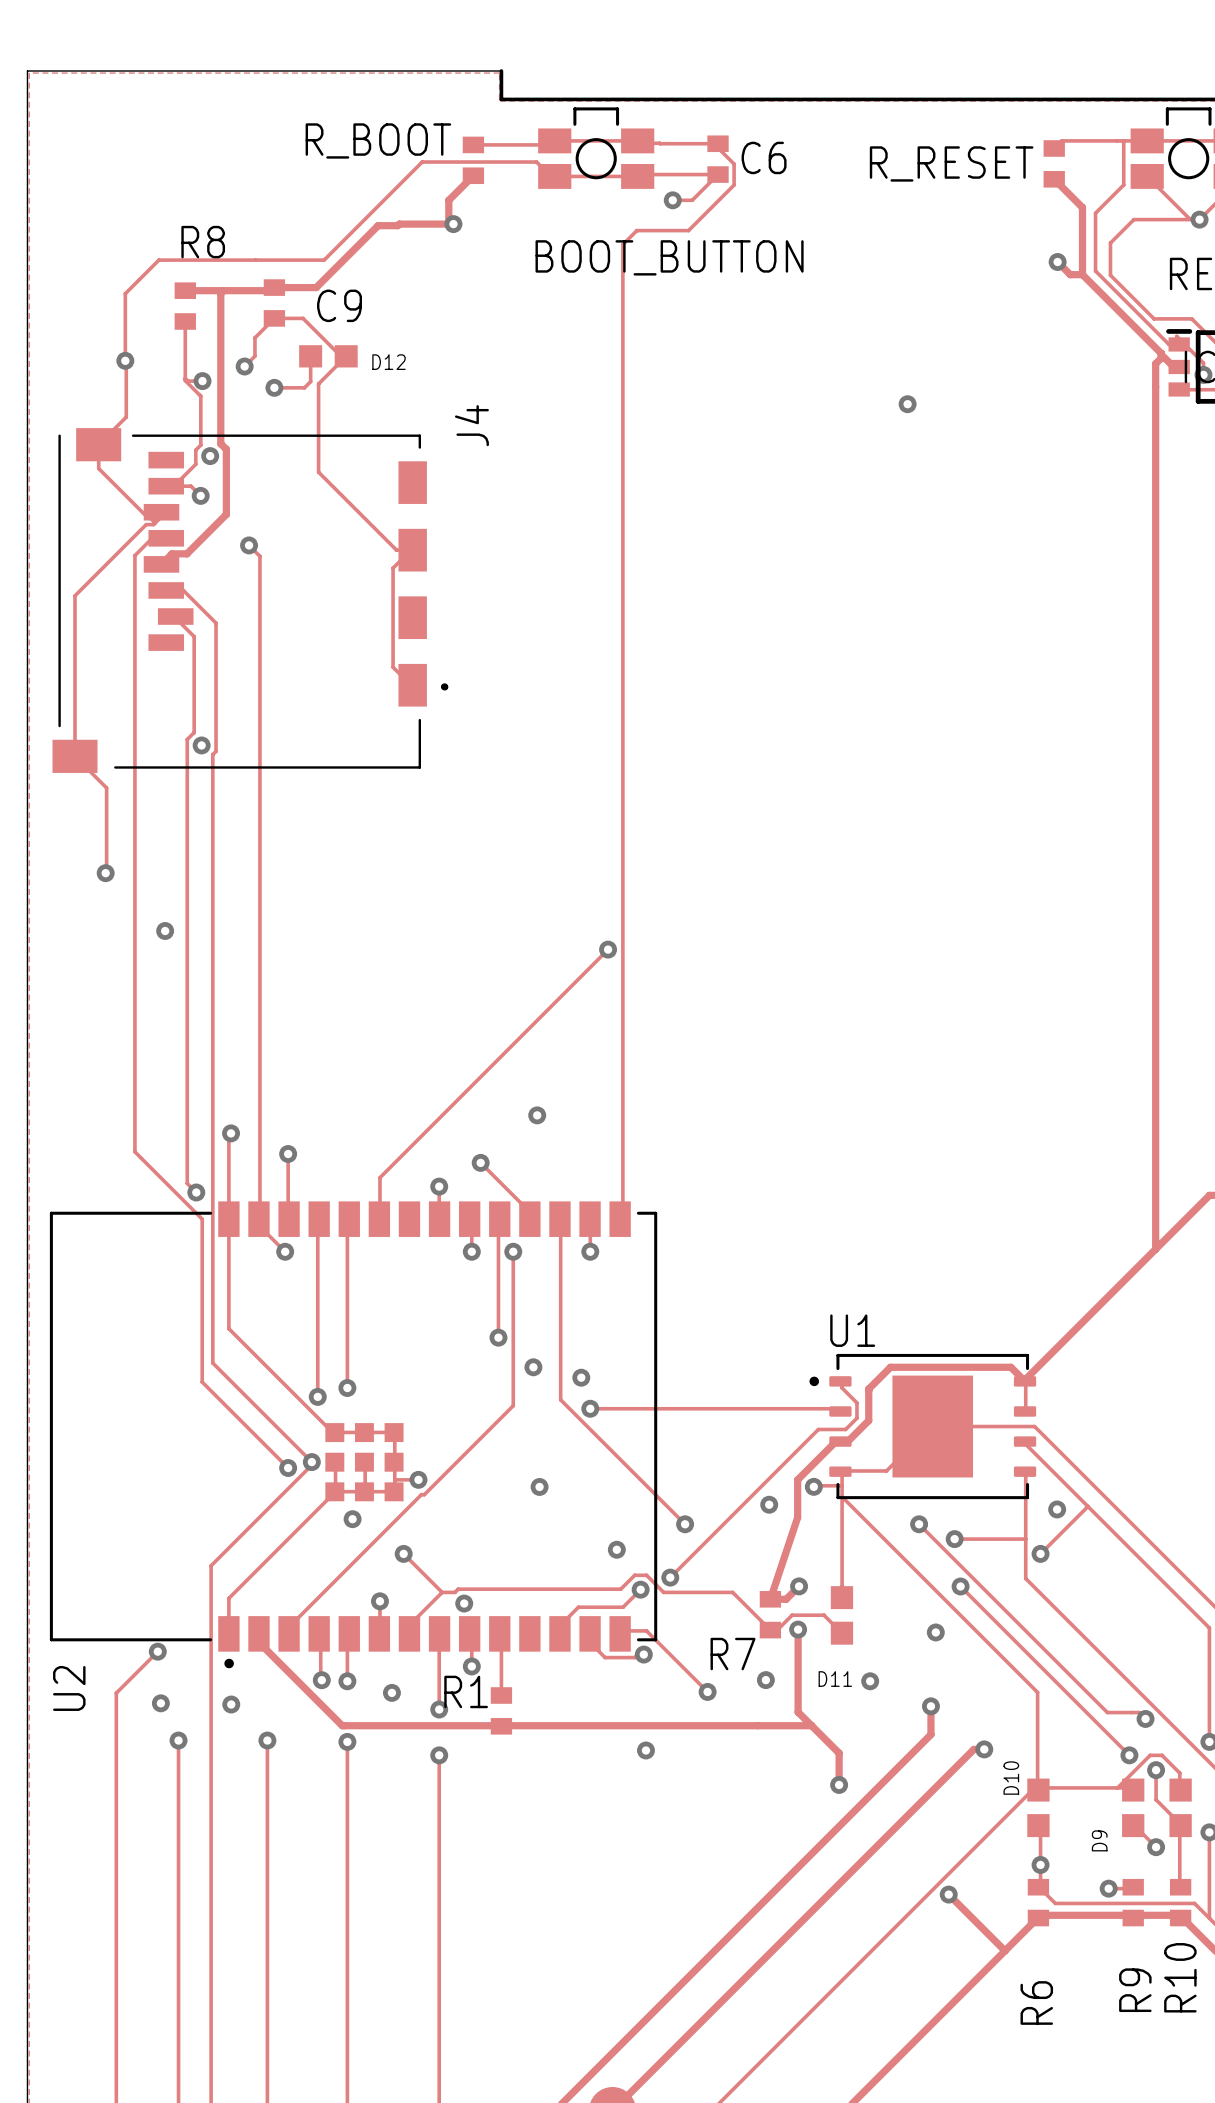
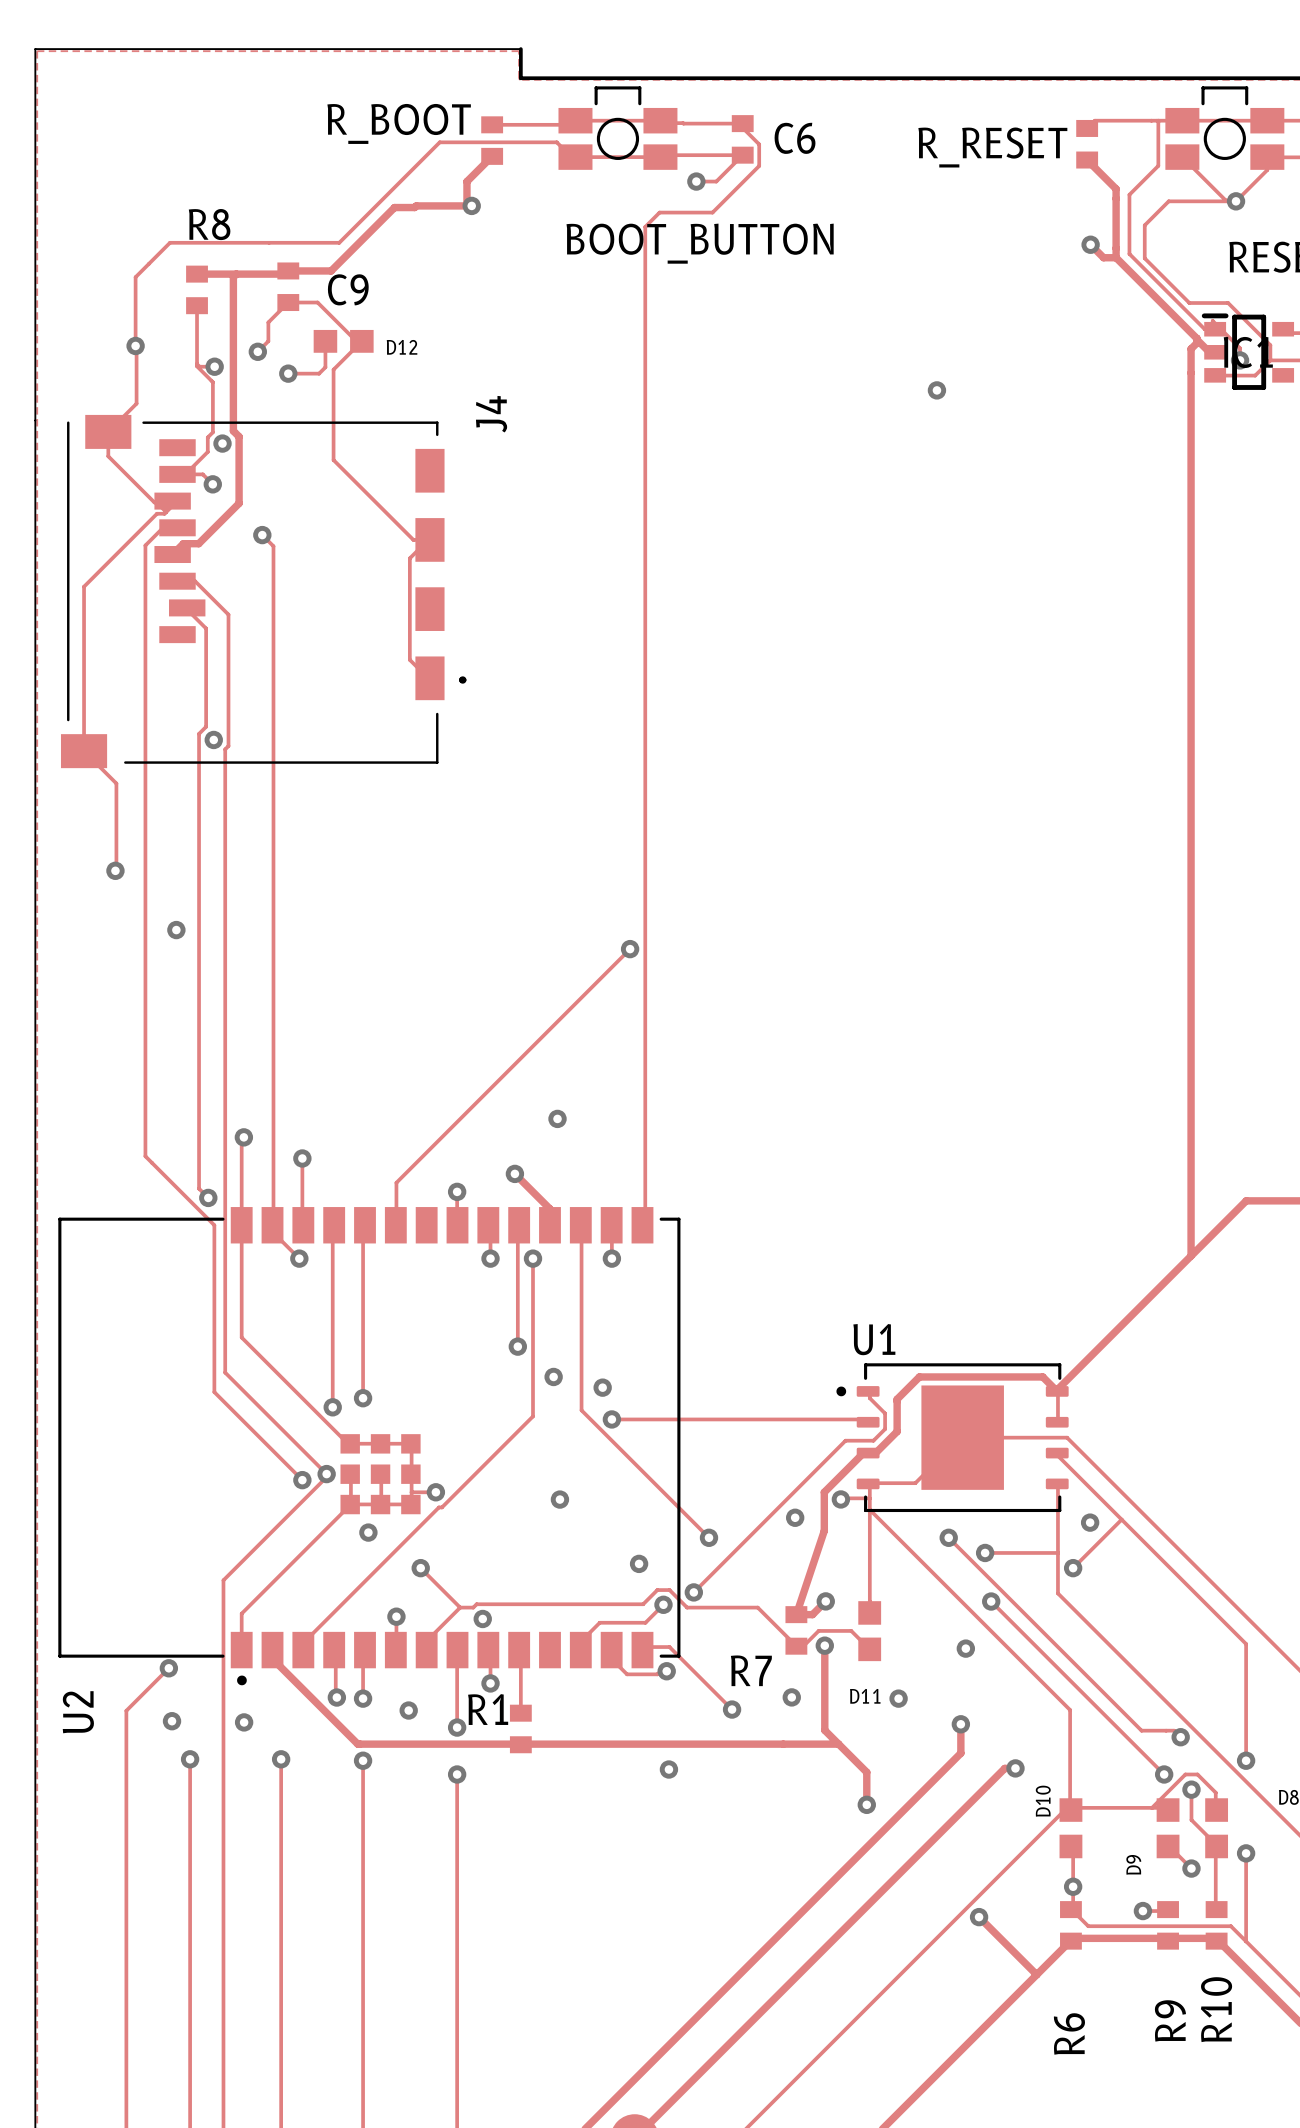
track: (480, 1162) (528, 1210) (528, 1219) (529, 1219) -> (514, 1173) (549, 1208) (549, 1225)
via position: (480, 1162) -> (514, 1173)

